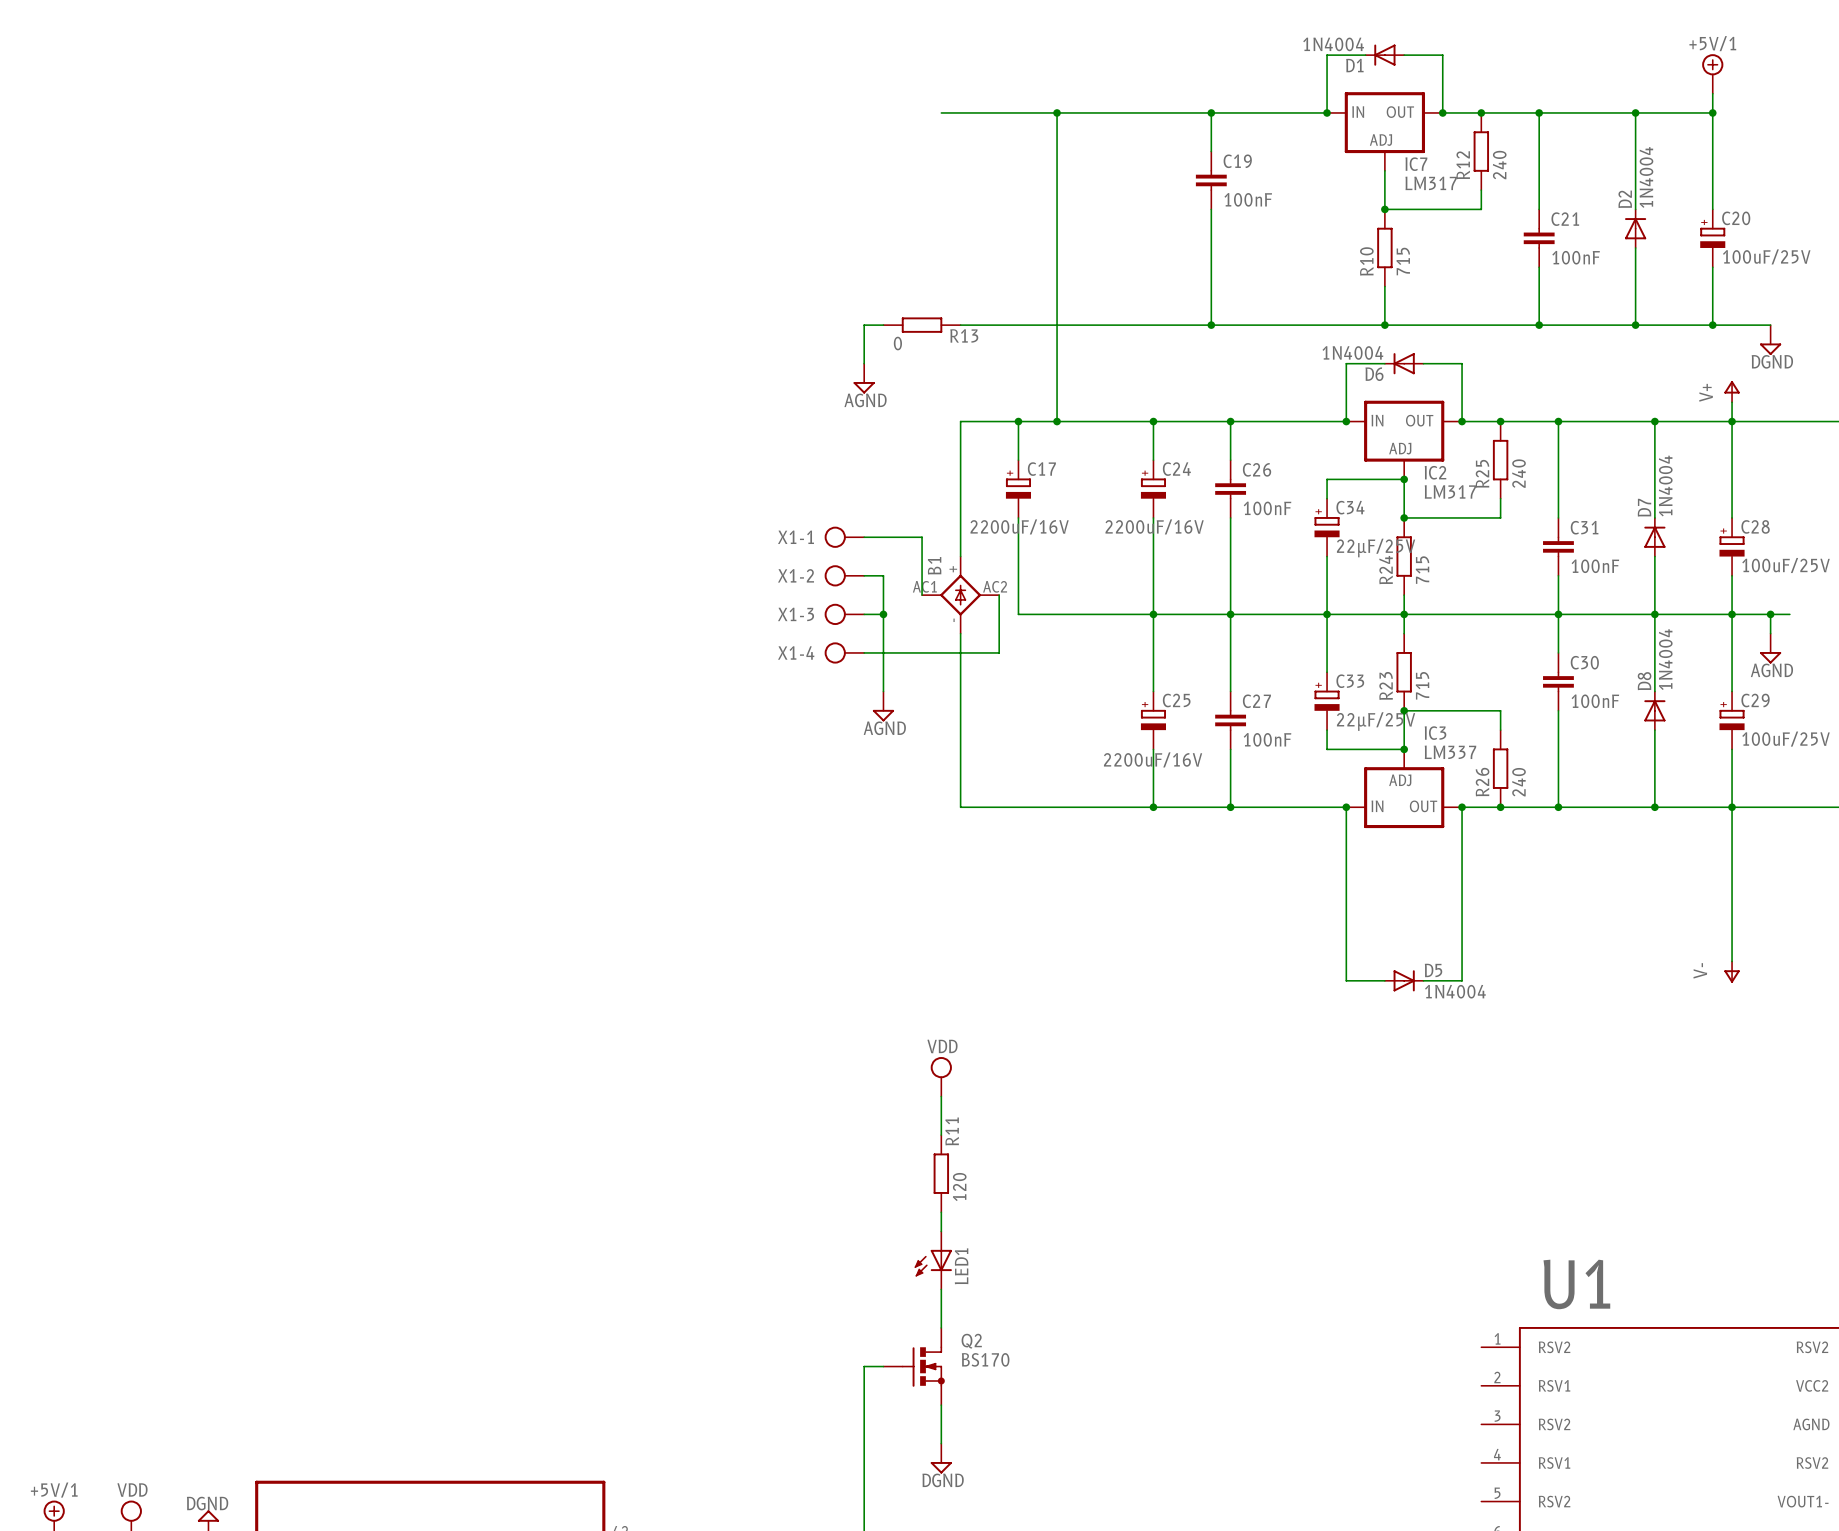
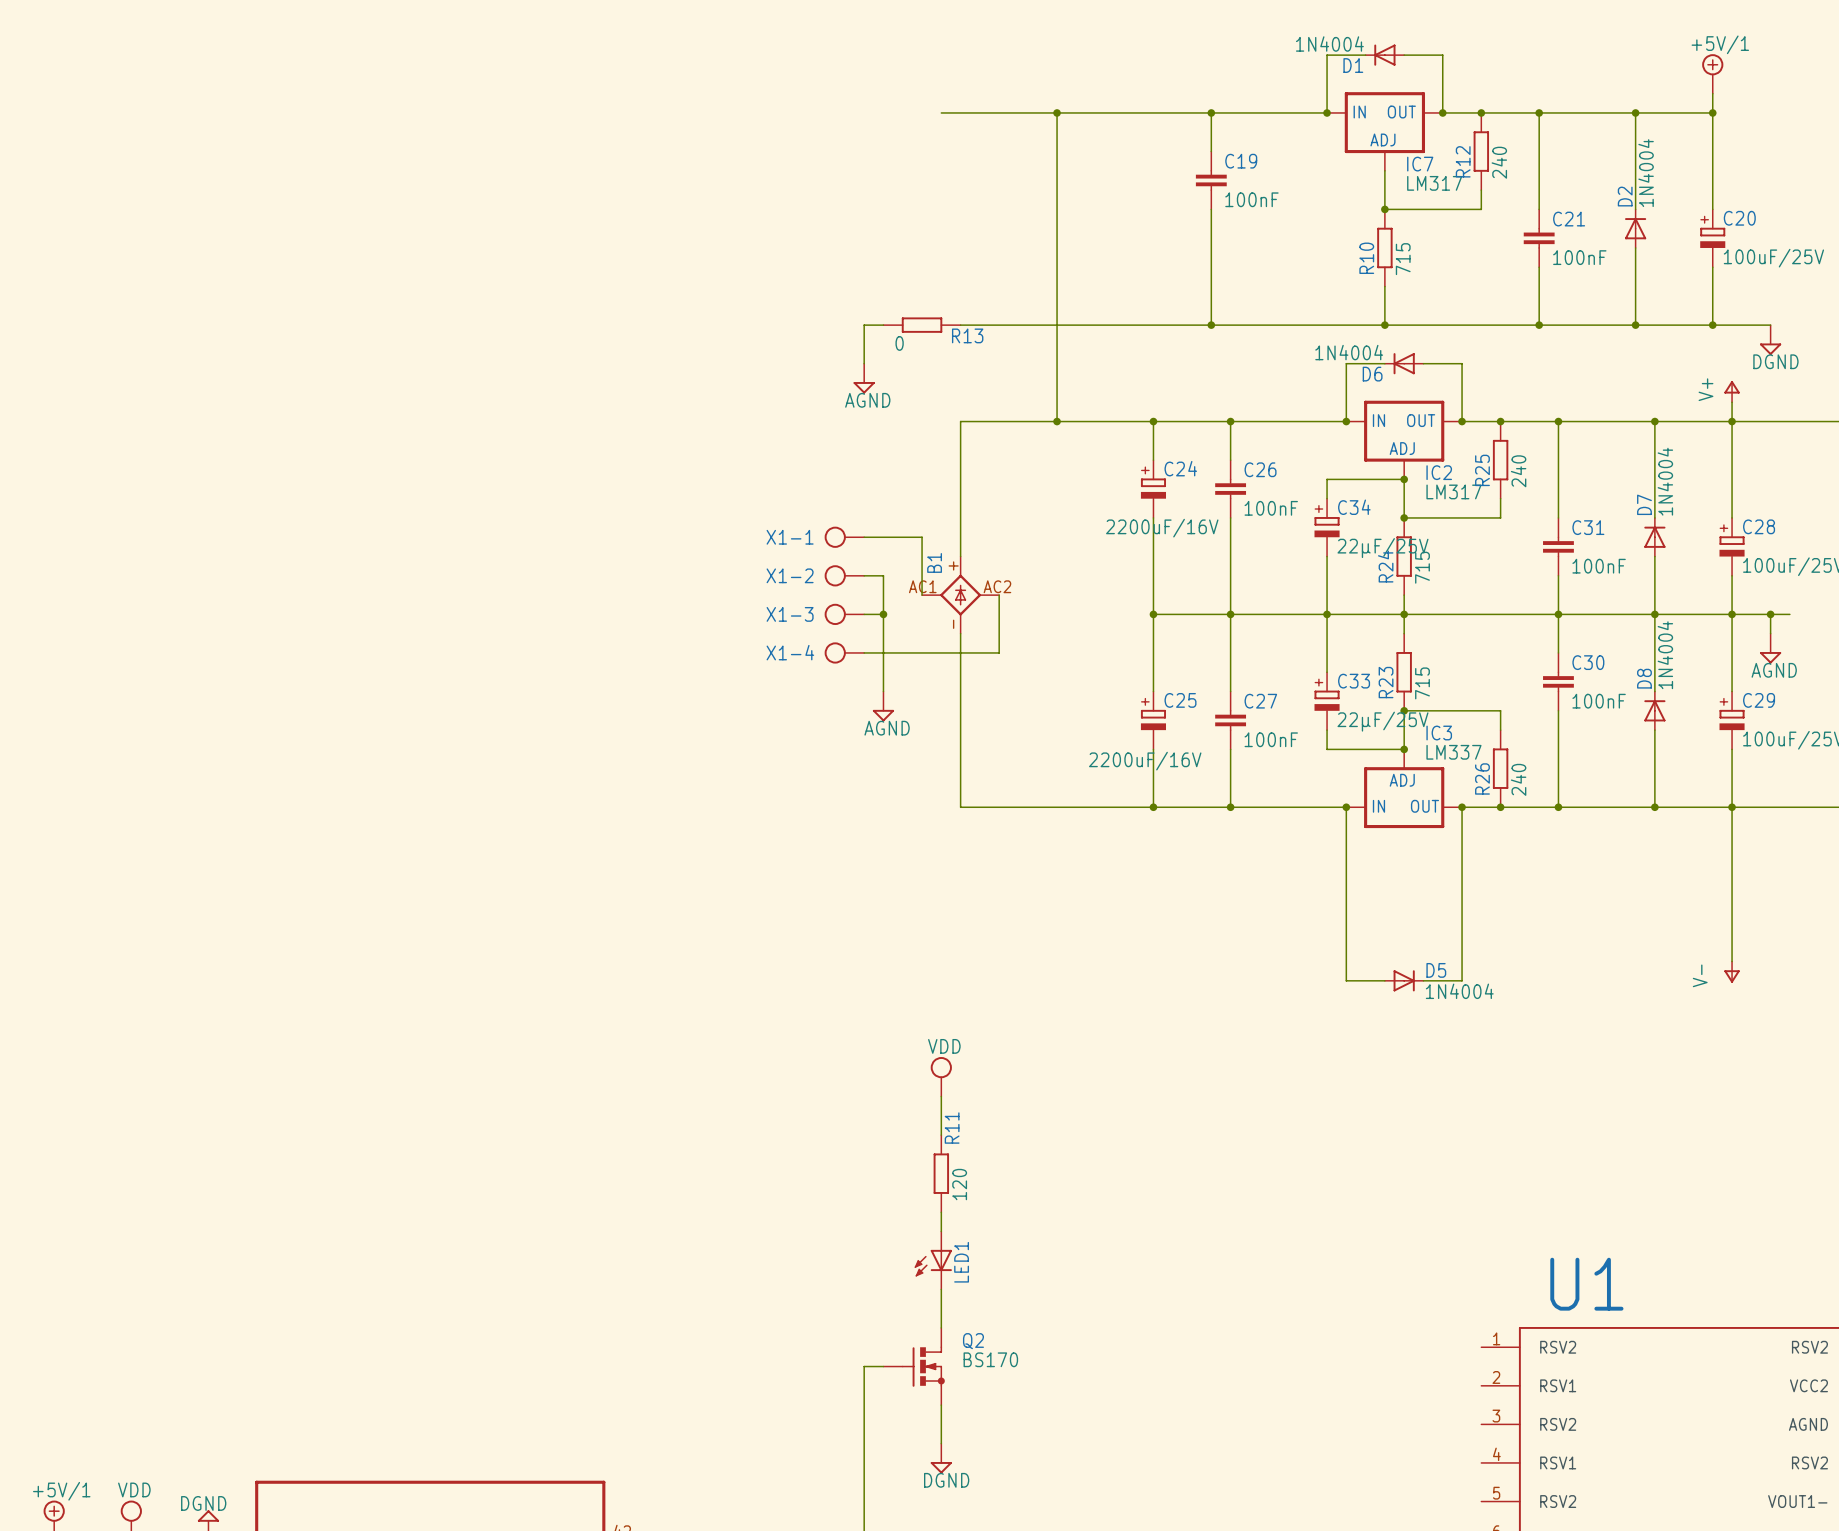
wire: (1018, 421) (1018, 460) -> none
junction: (1018, 421) -> none
C17: 2200uF/16V (1018, 489) -> none
wire: (1018, 517) (1018, 614) (1153, 614) -> none

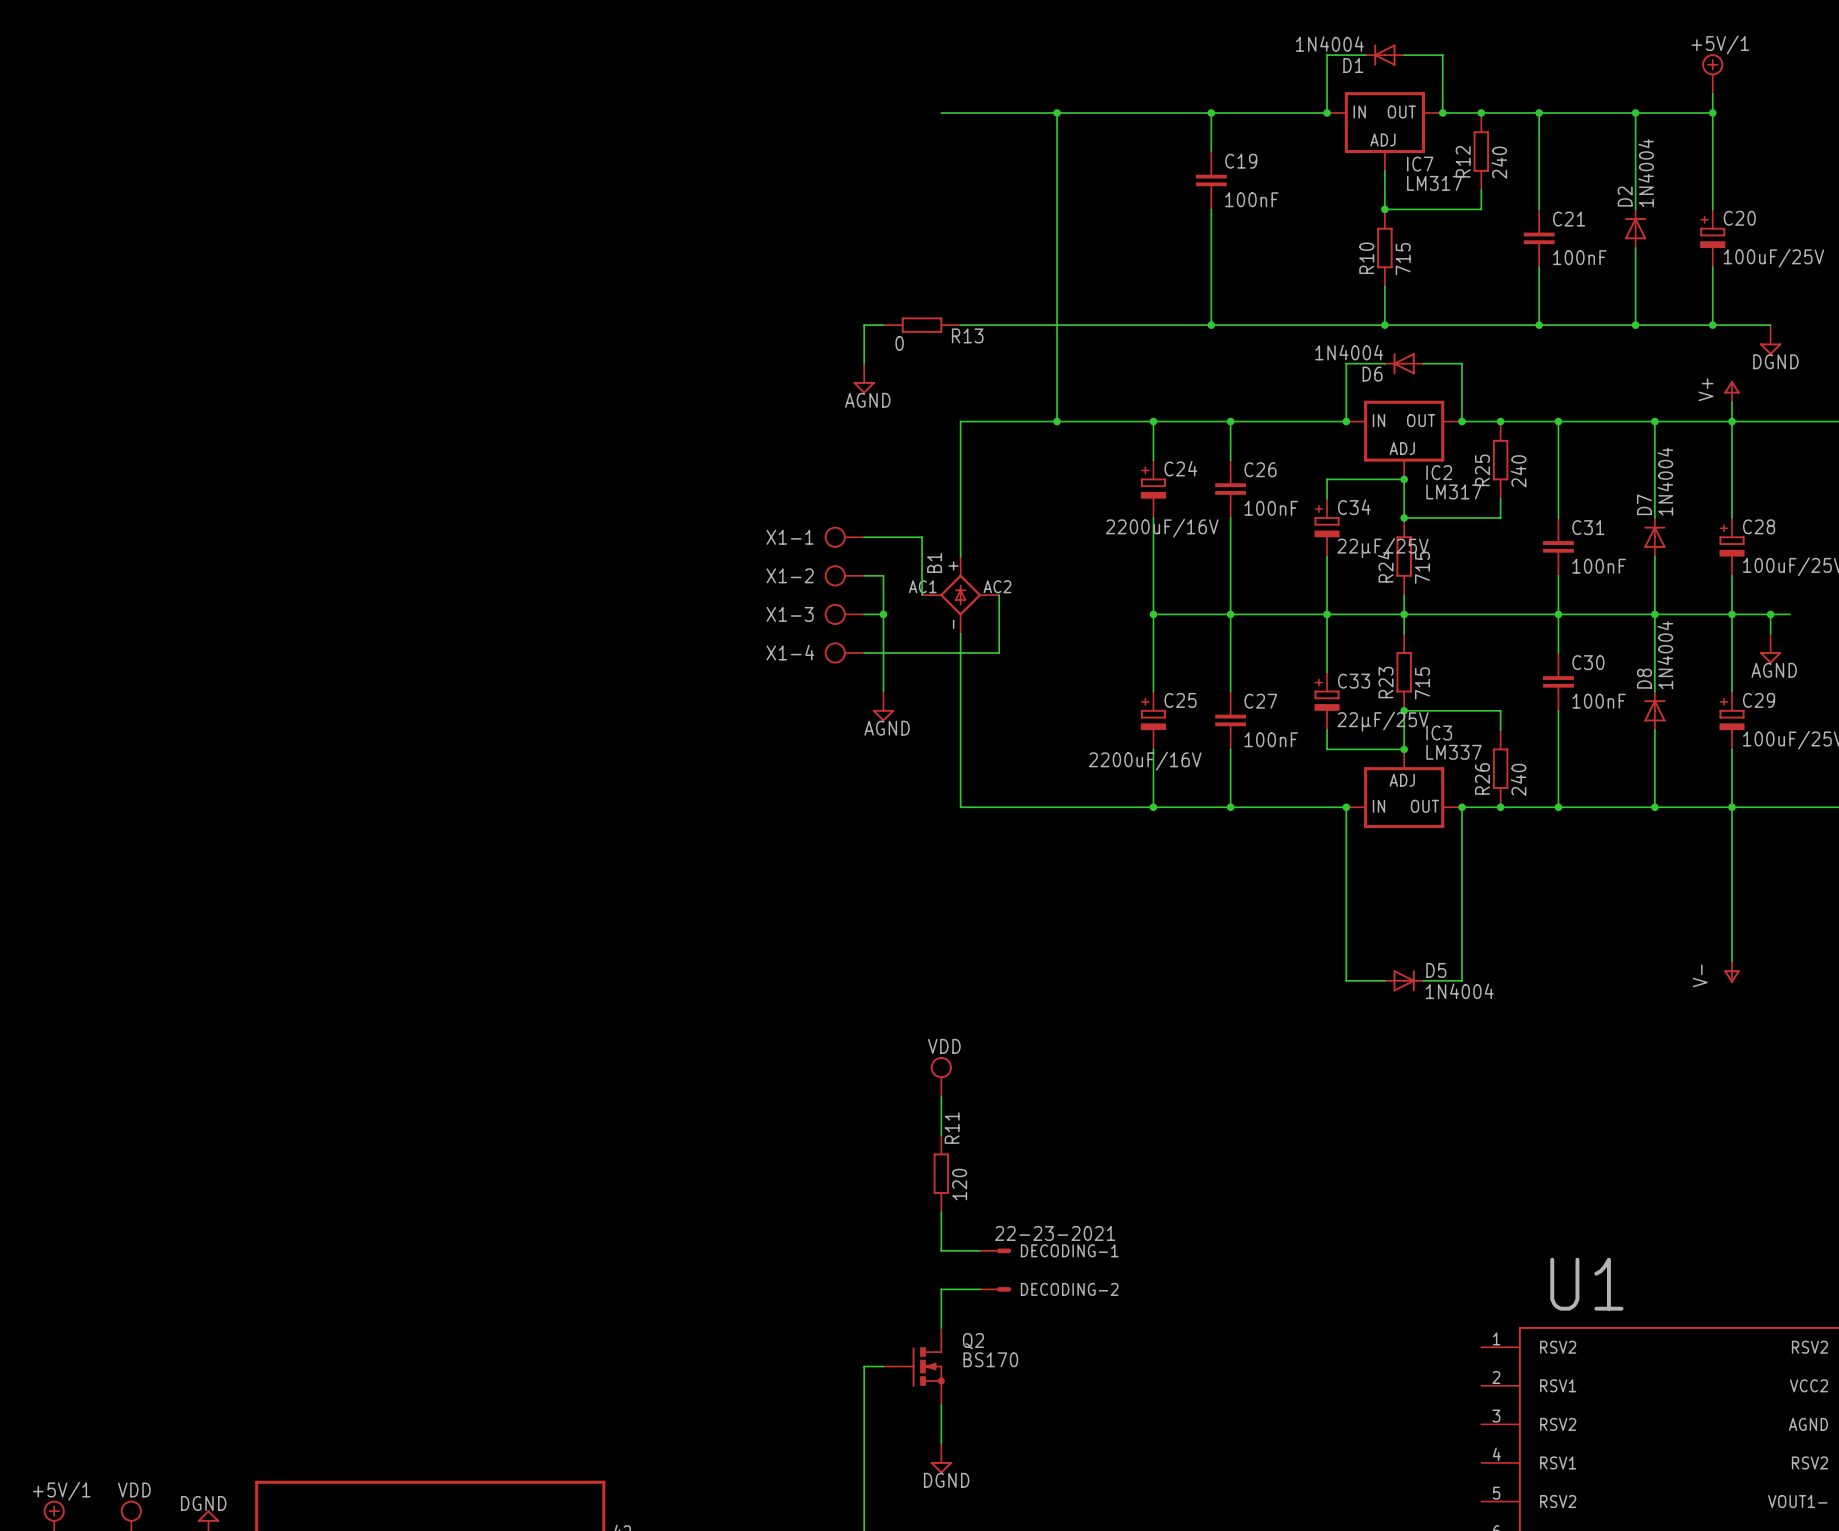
wire: none -> (941, 1231) (941, 1250) (979, 1250)
DECODING-1: none -> 22-23-2021 (995, 1250)
LED1: (933, 1260) -> none
wire: none -> (941, 1289) (979, 1289)
DECODING-2: none -> (995, 1289)

